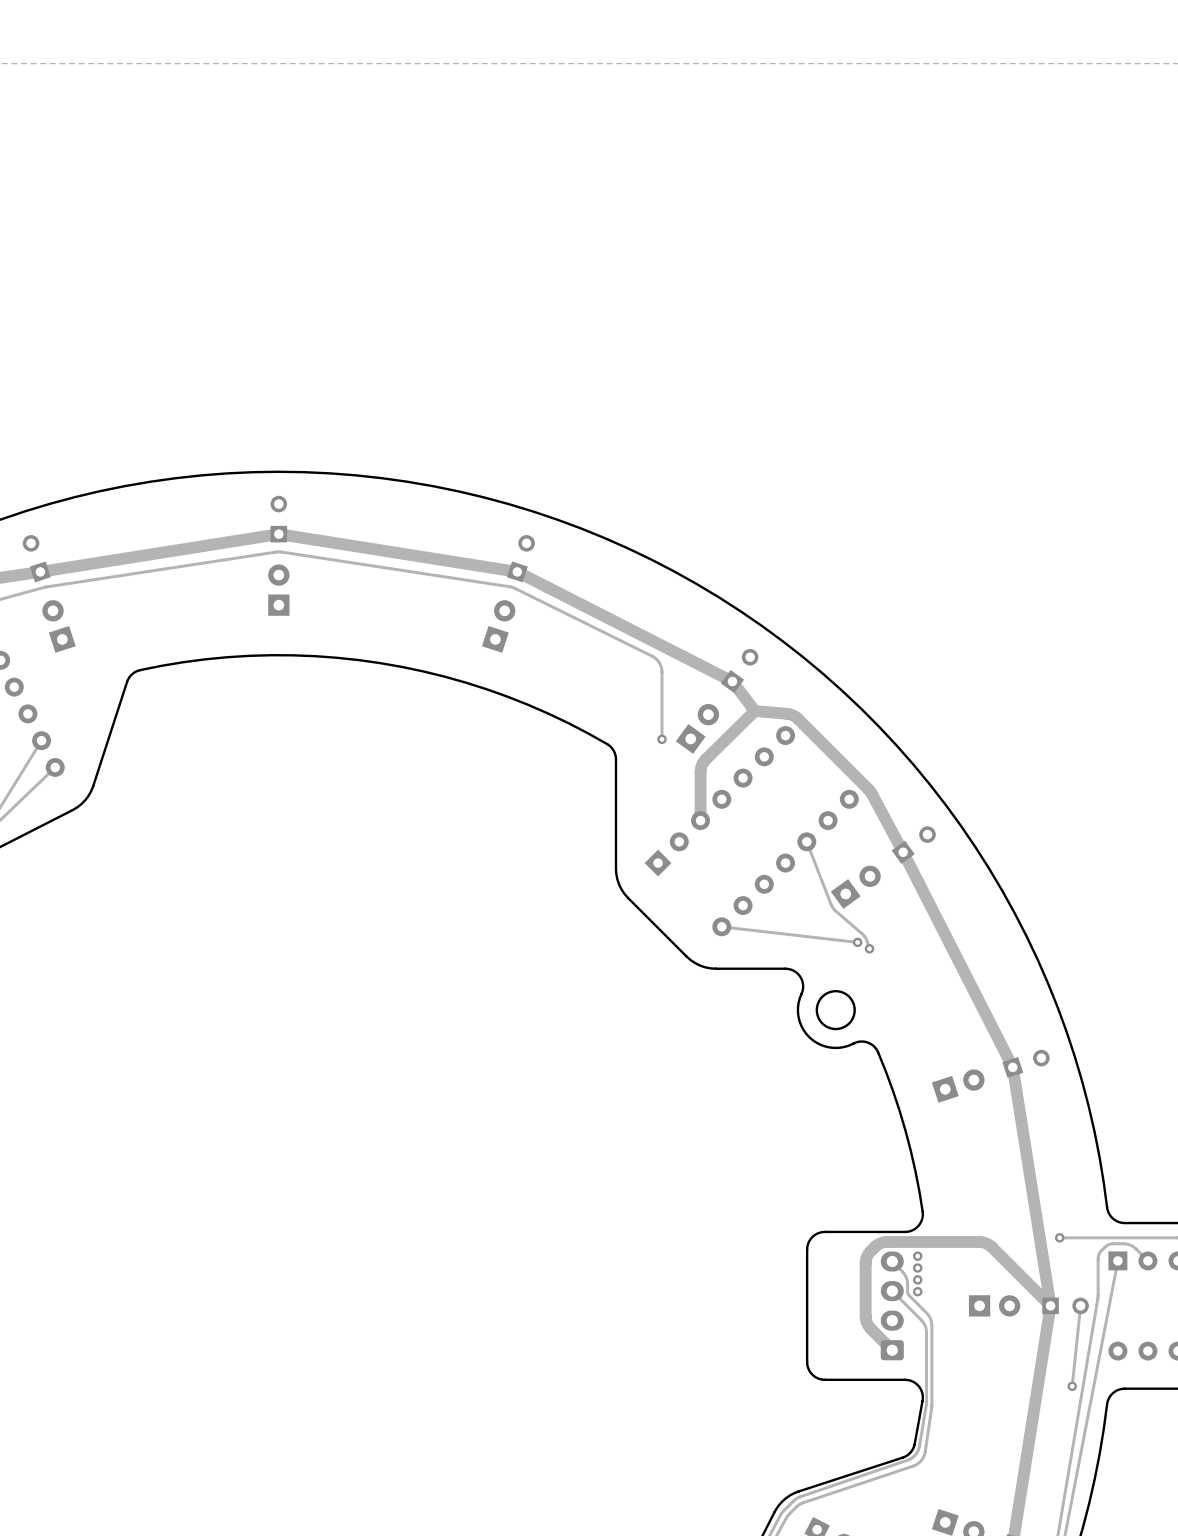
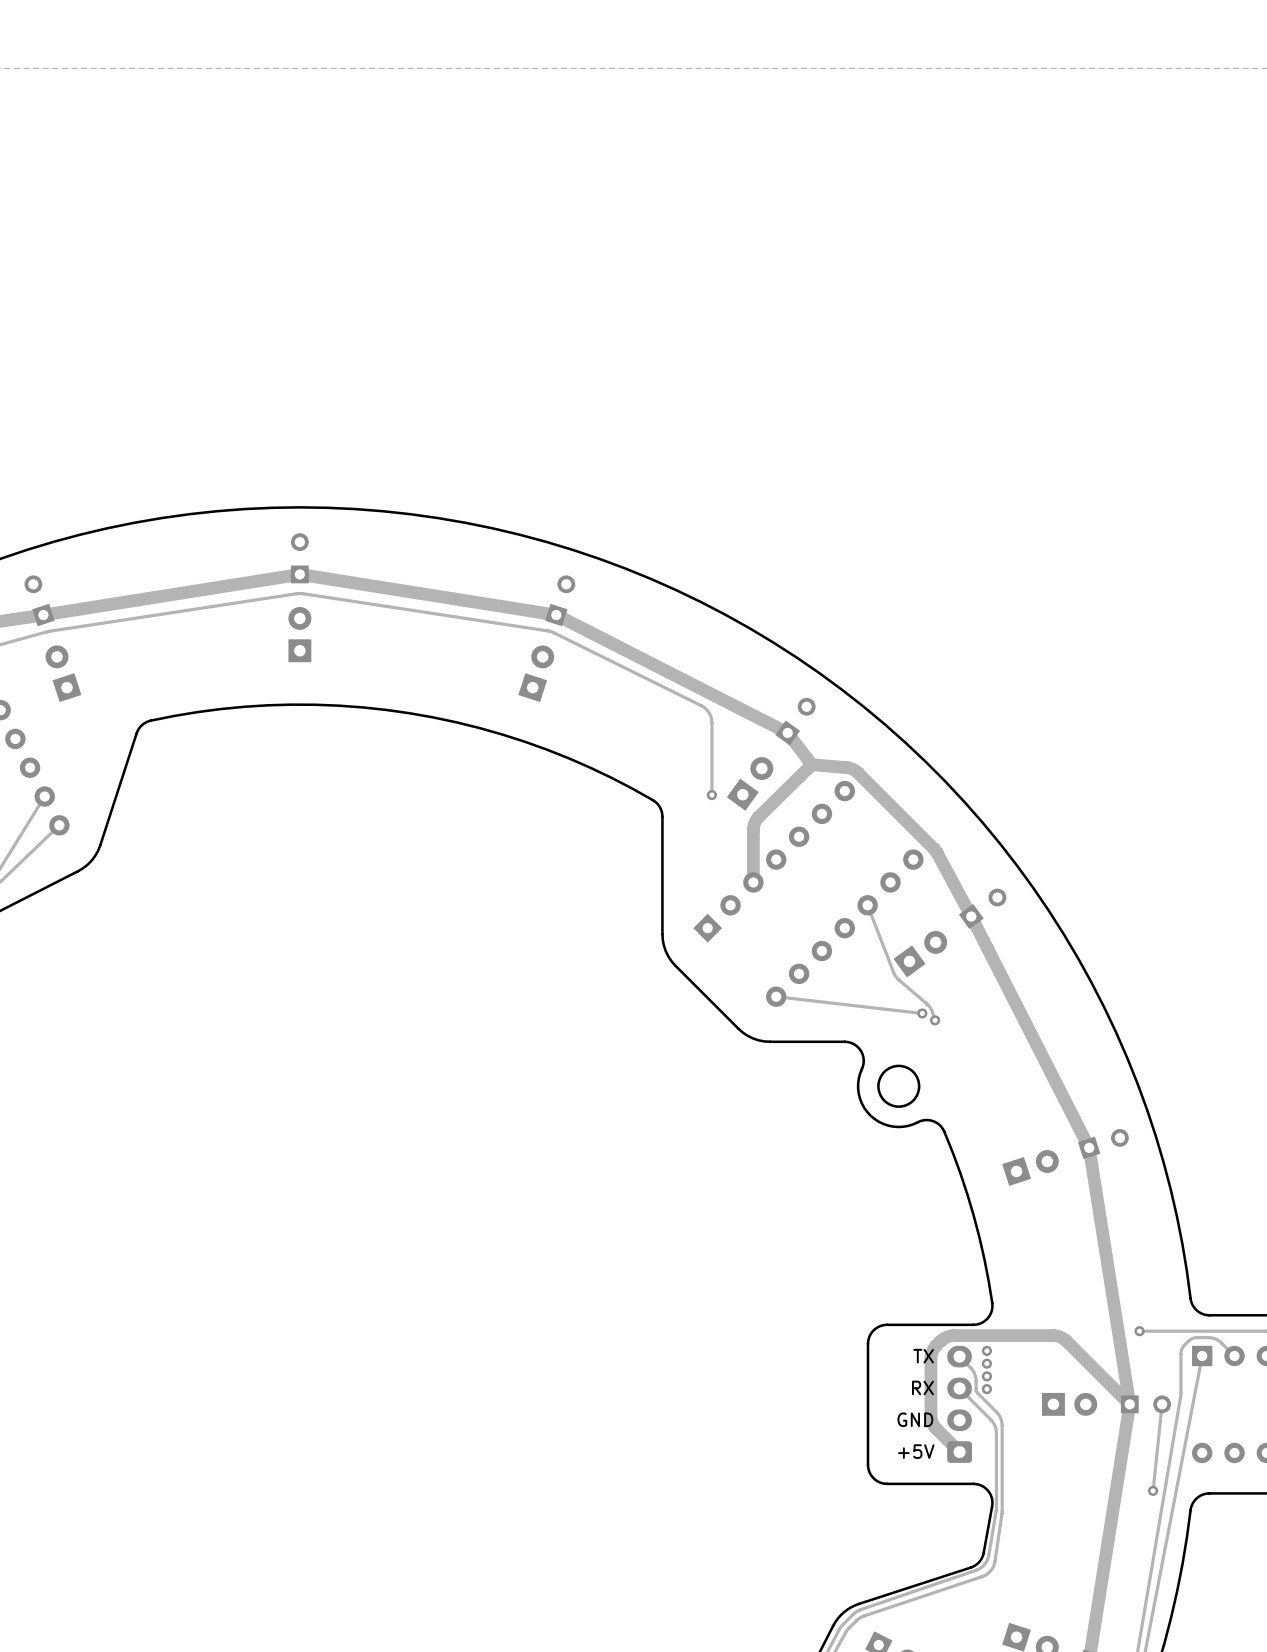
text: none -> TX (923, 1356)
text: none -> RX (922, 1387)
text: none -> GND (915, 1419)
text: none -> +5V (916, 1451)

